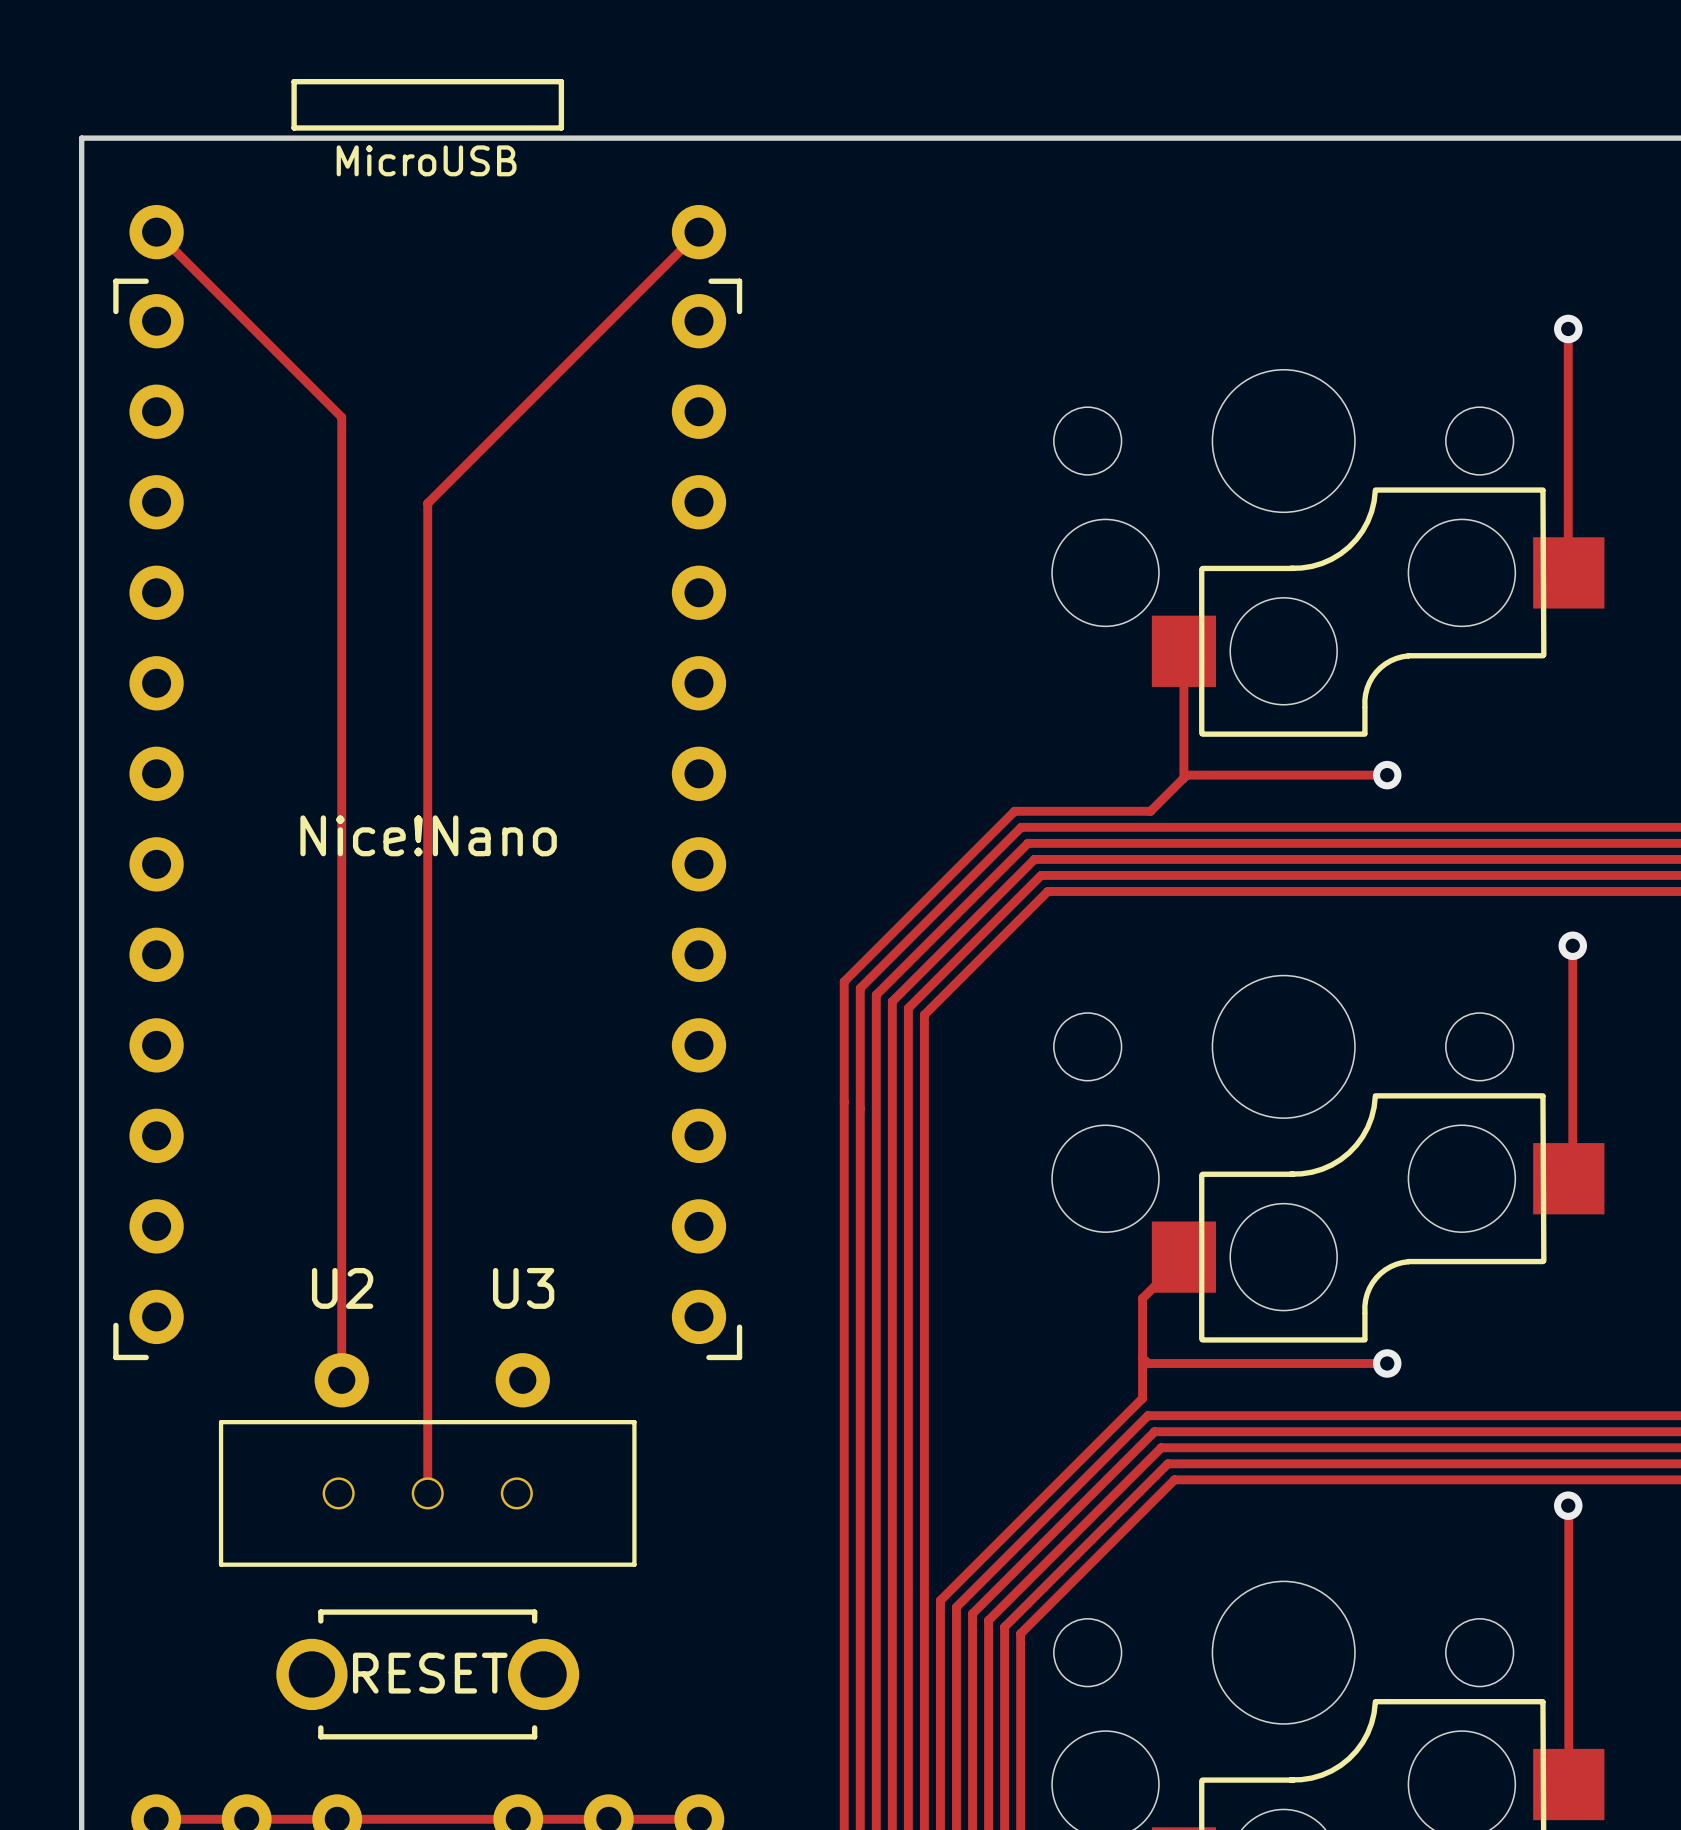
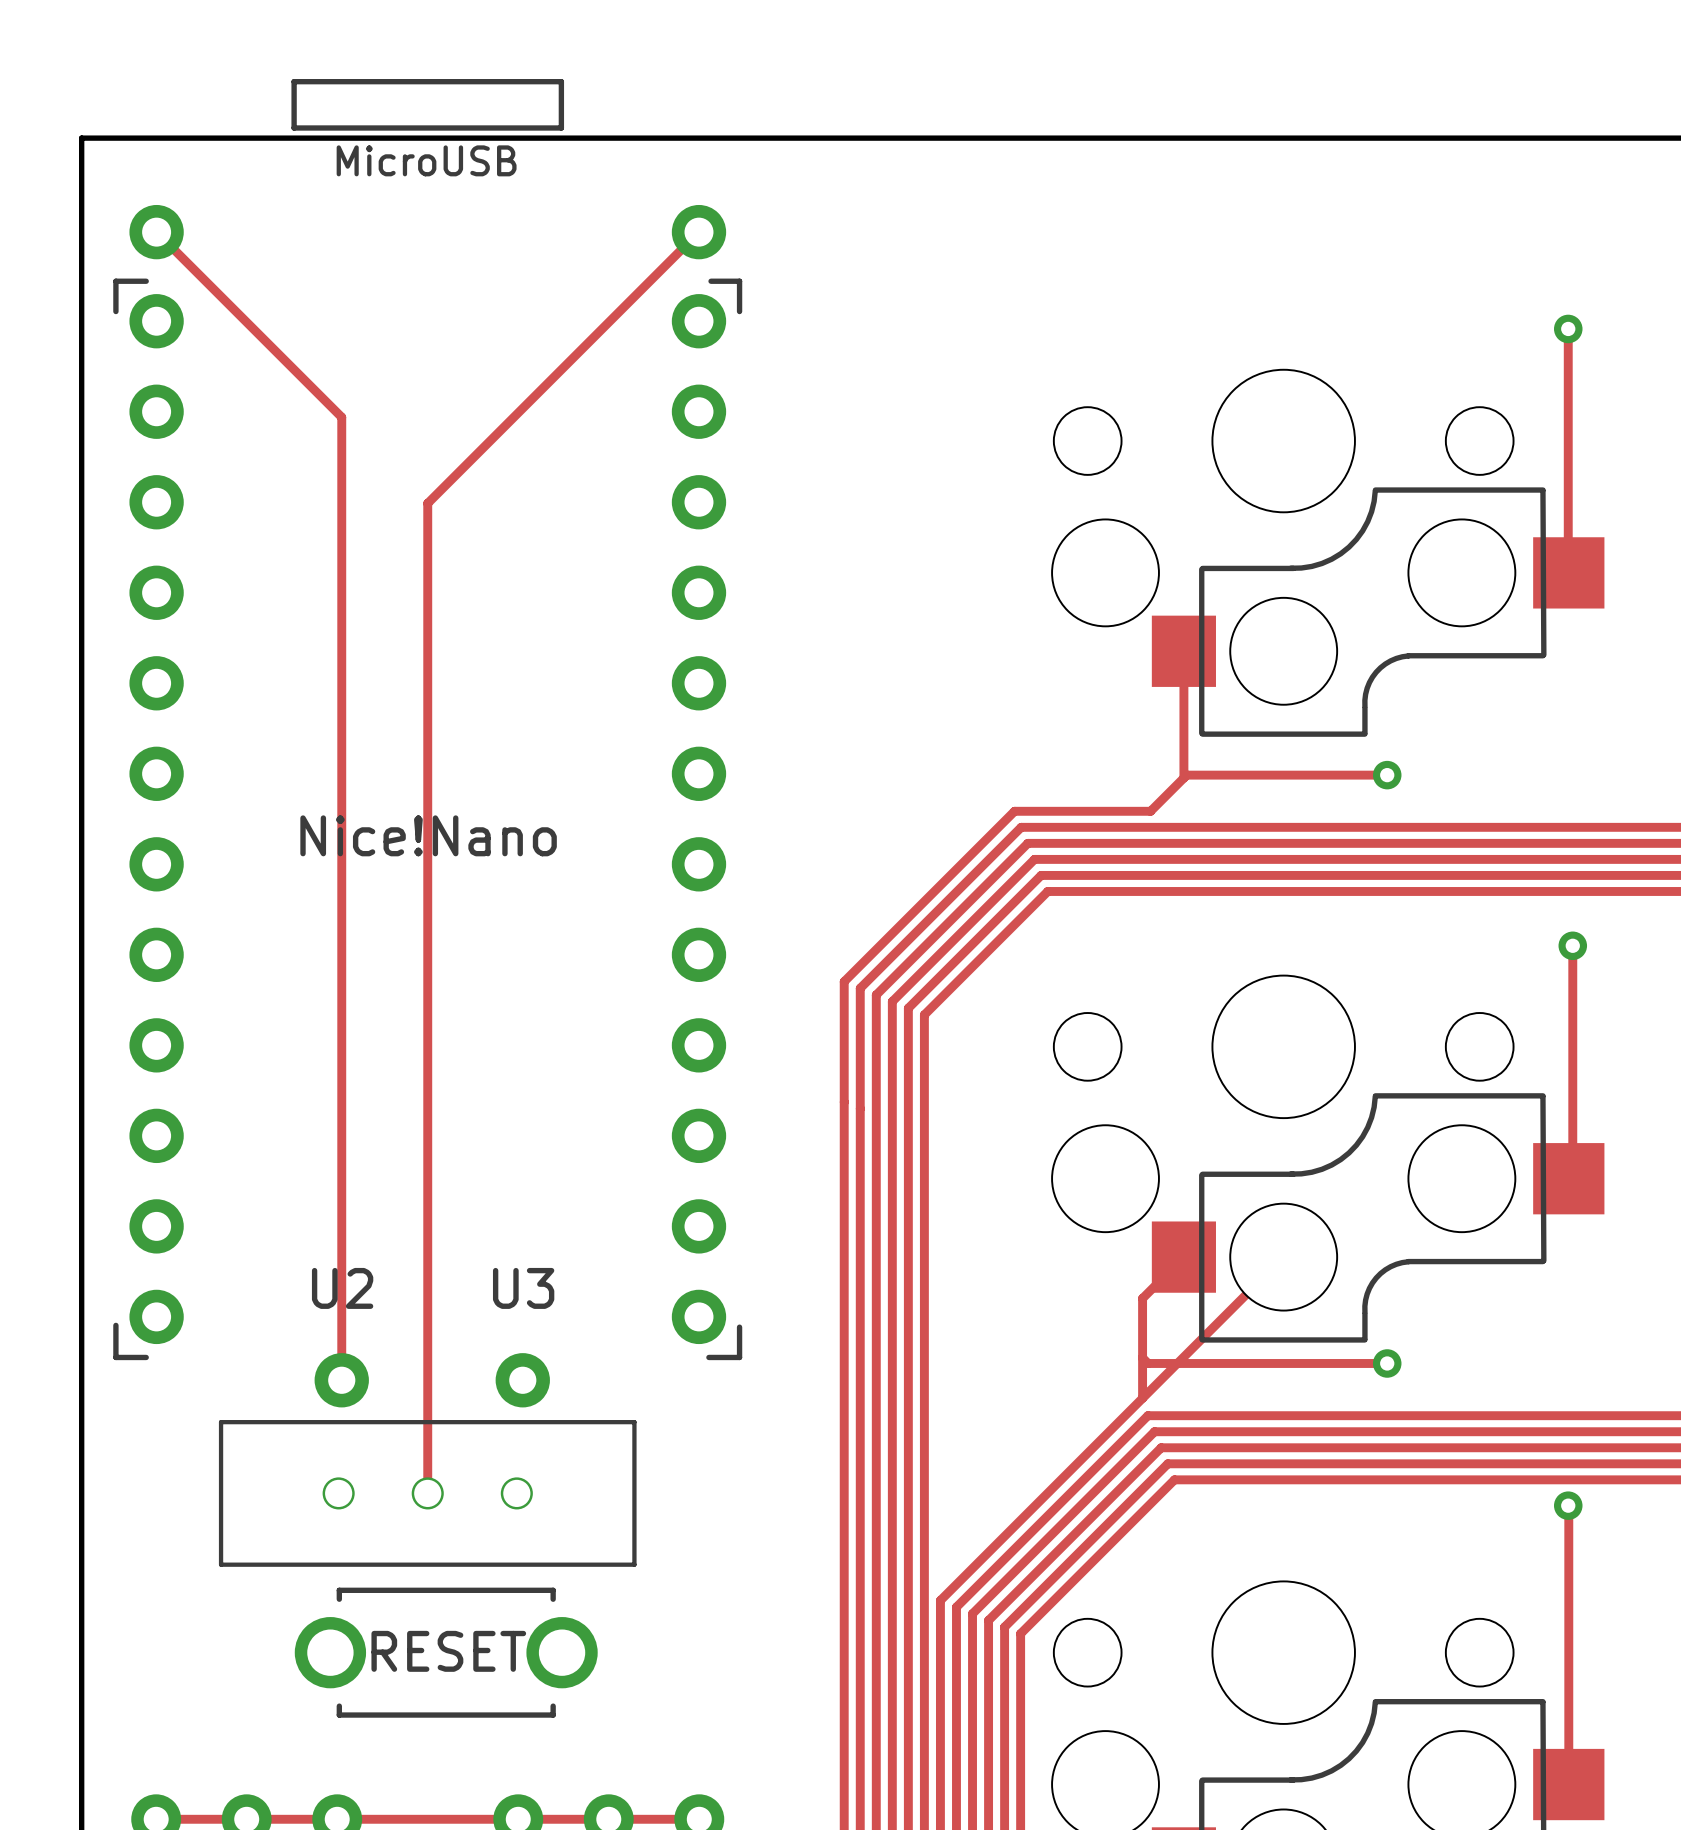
track: (1142, 1398) (940, 1600) -> (1283, 1257) (940, 1600)
part position: (427, 1674) -> (446, 1652)

